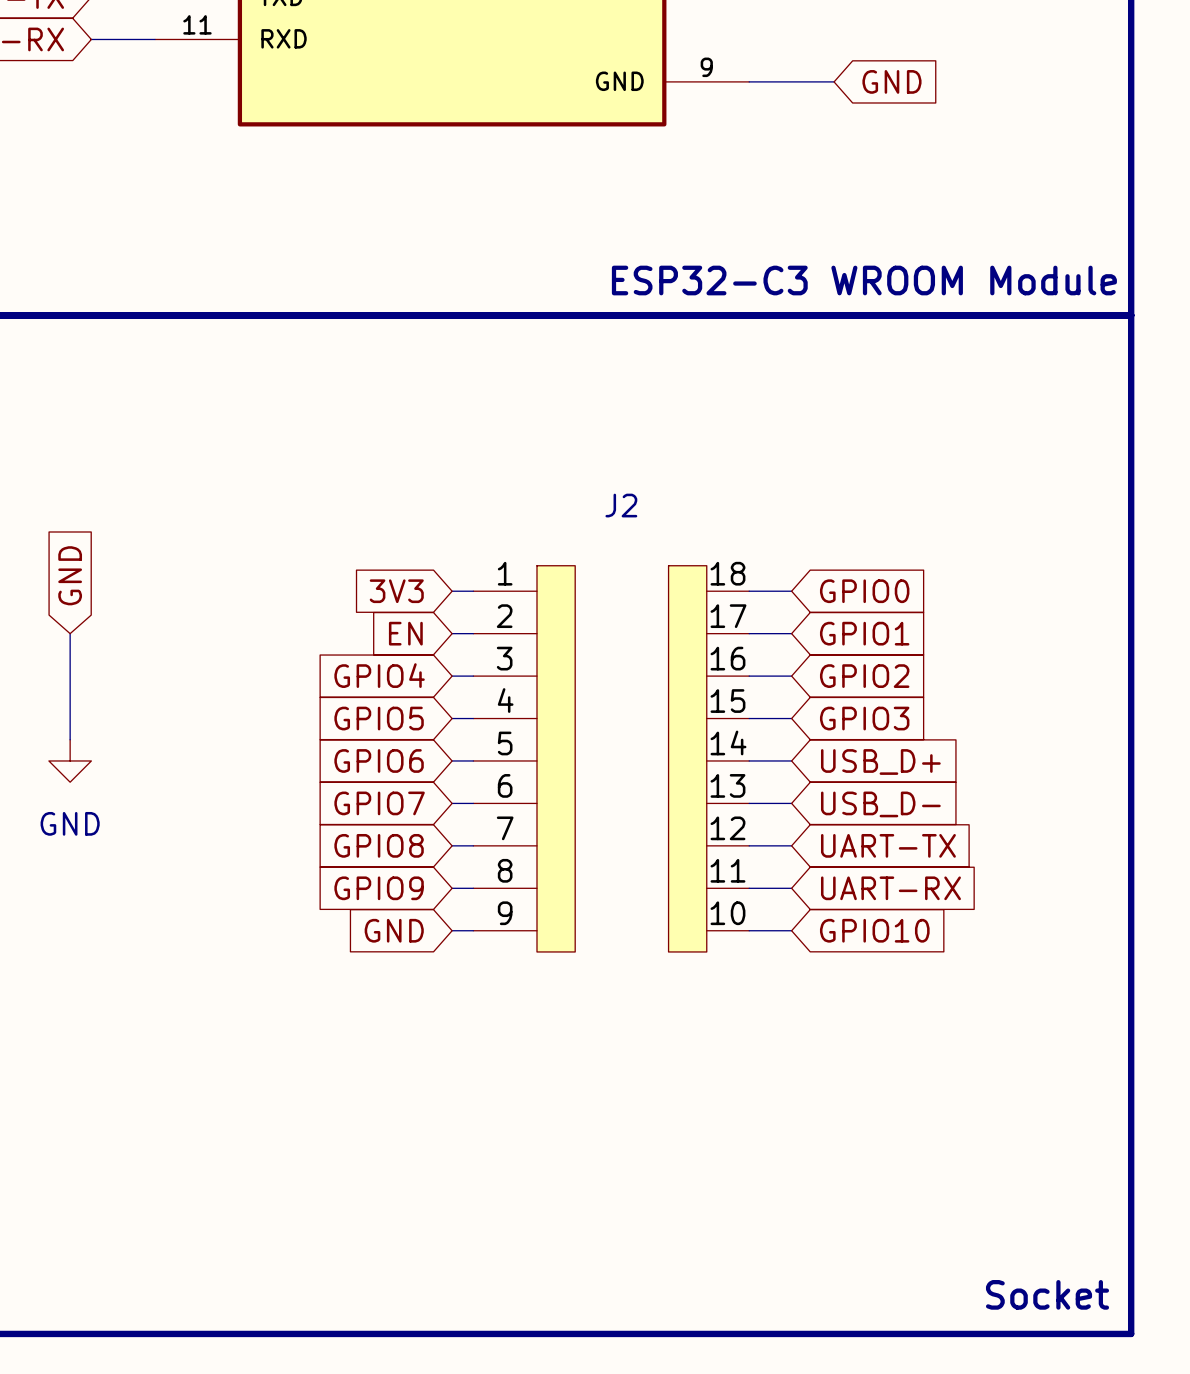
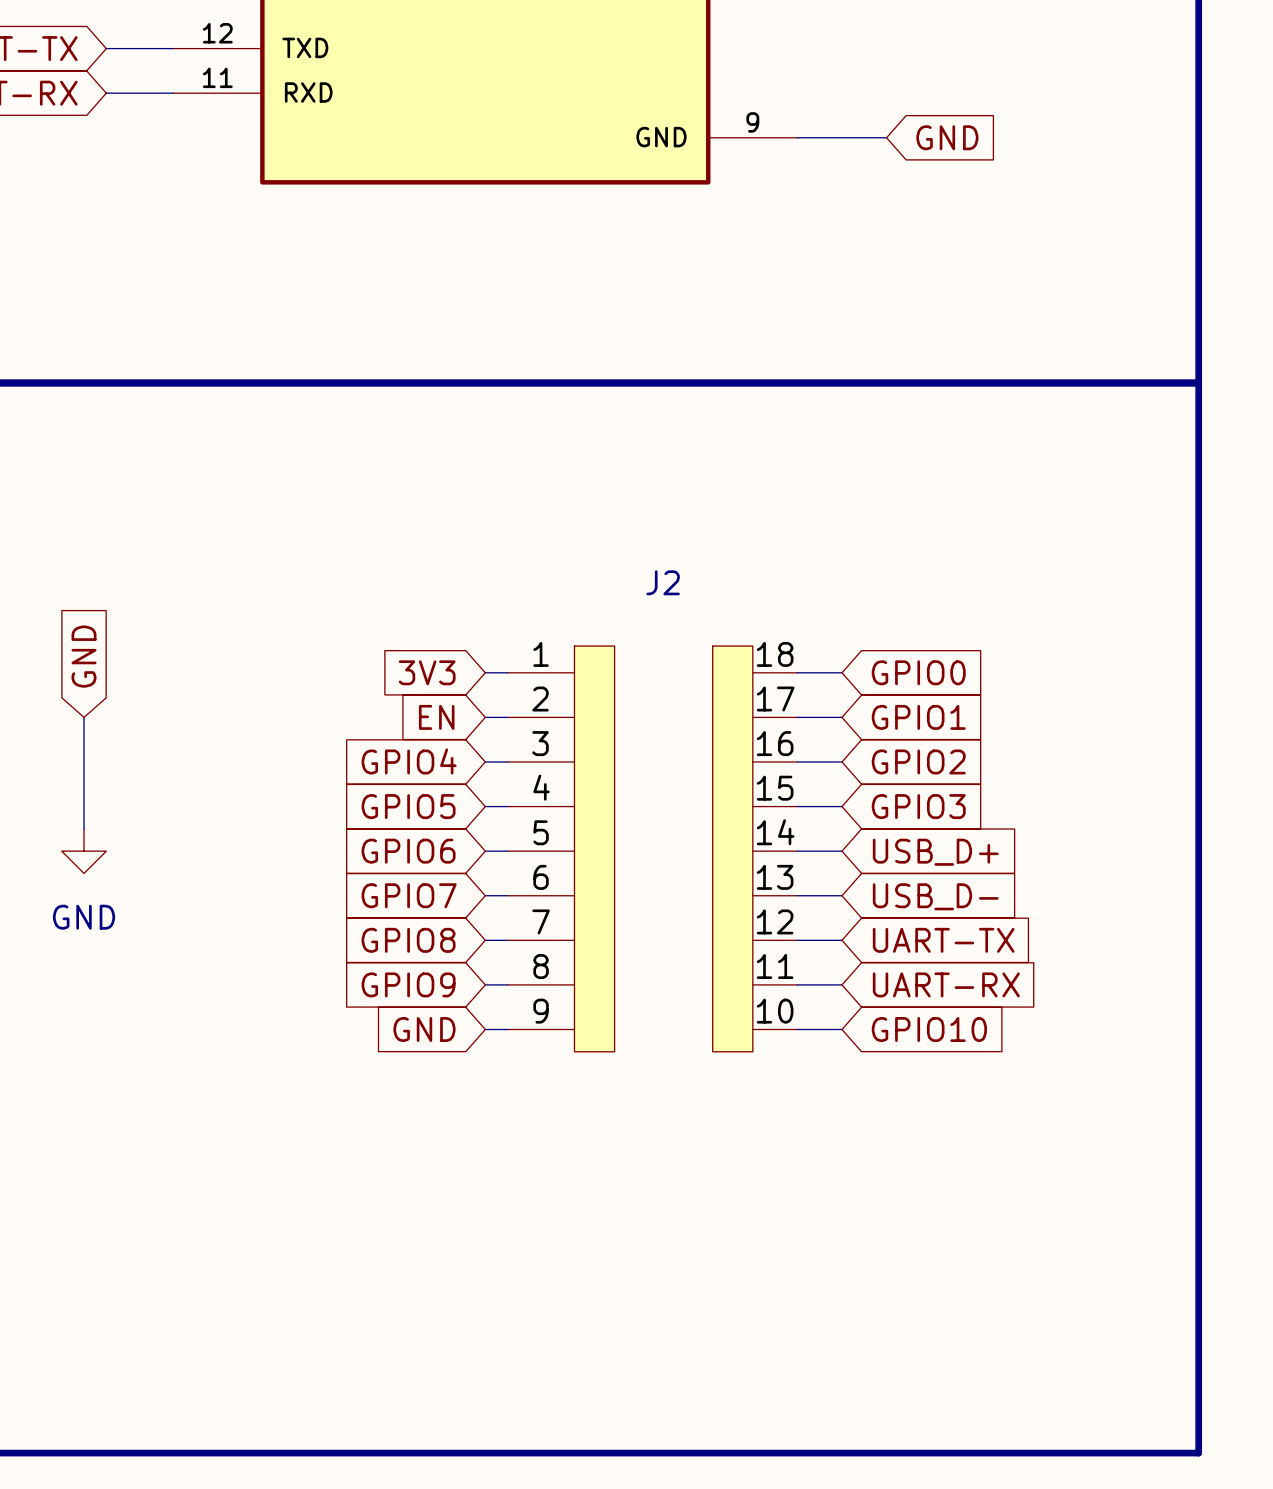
text: ESP32-C3 WROOM Module (864, 280) -> none
text: Socket (1047, 1294) -> none

